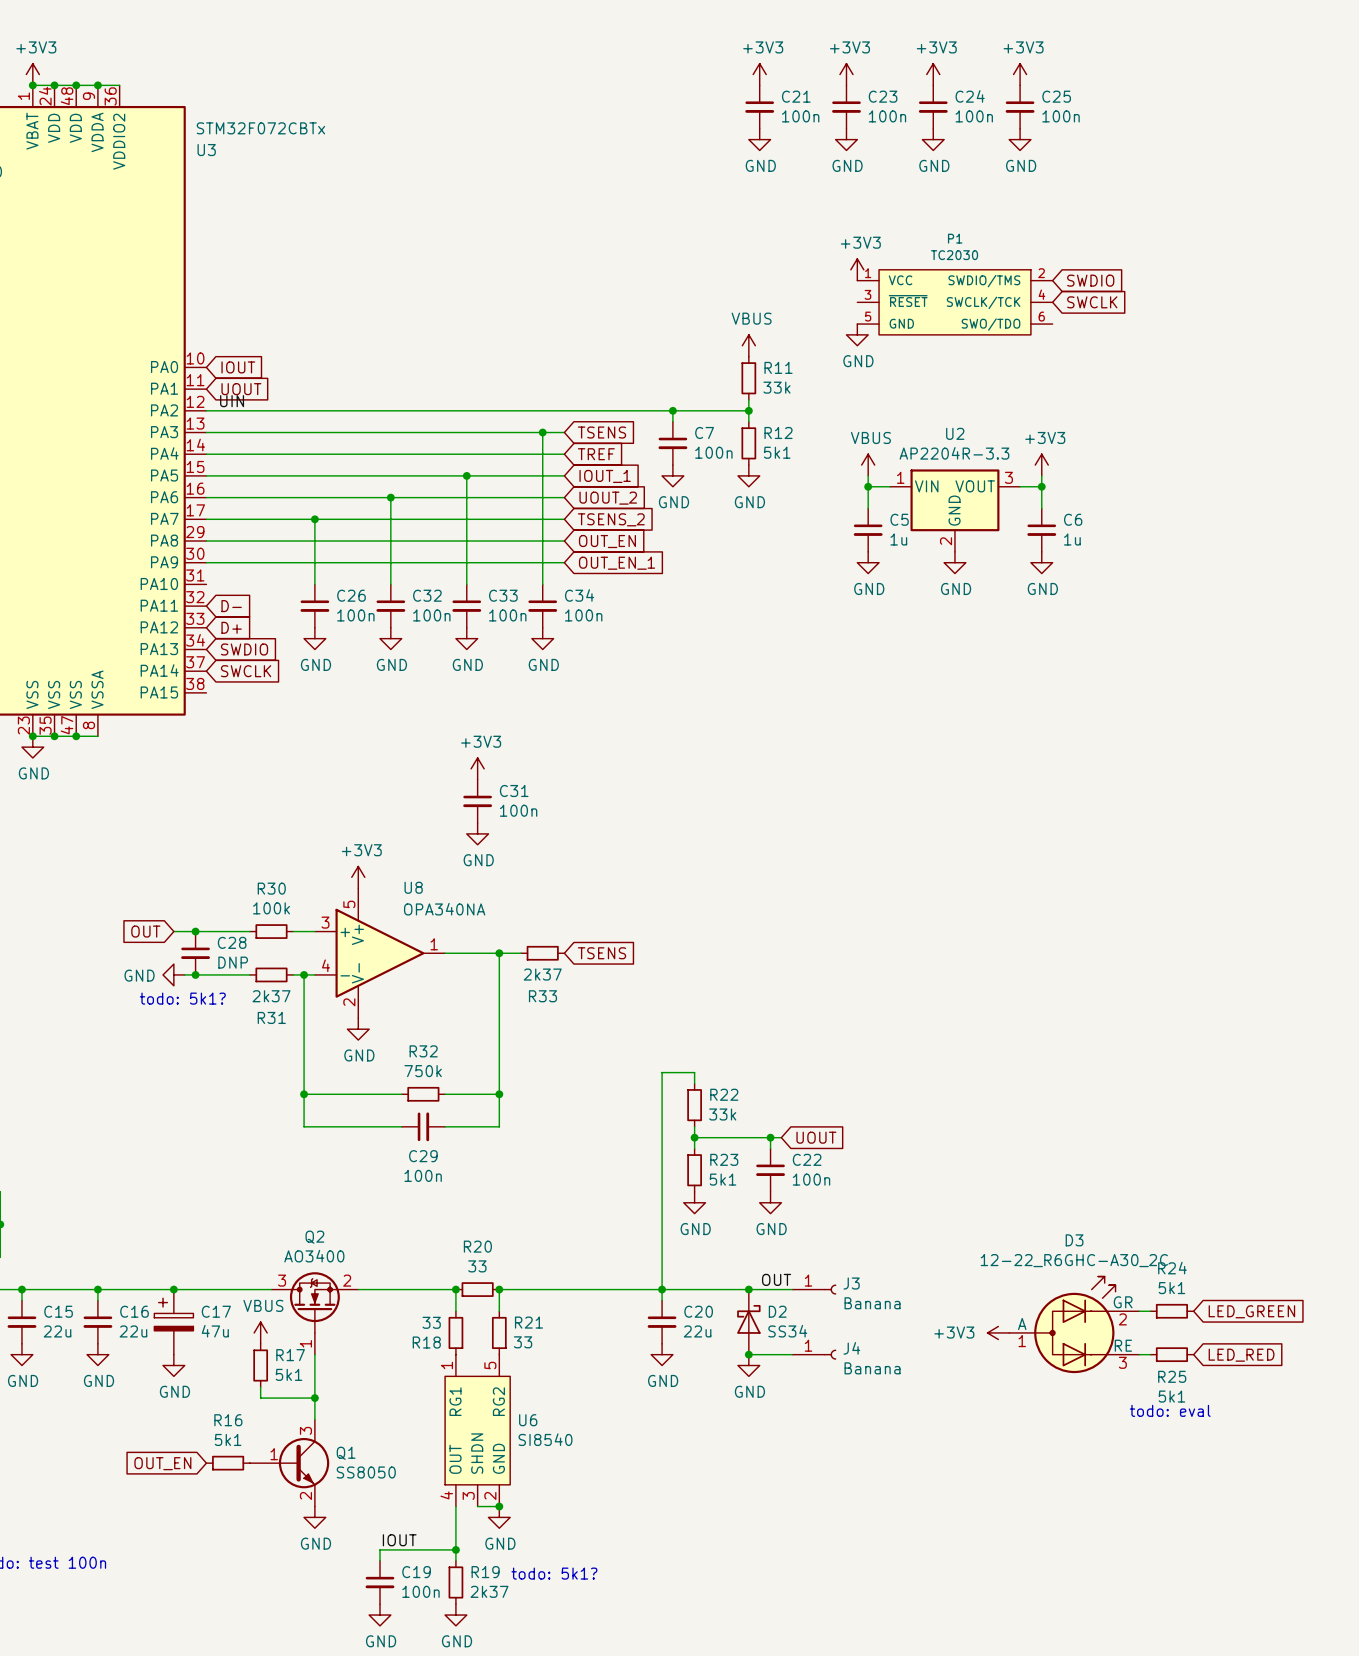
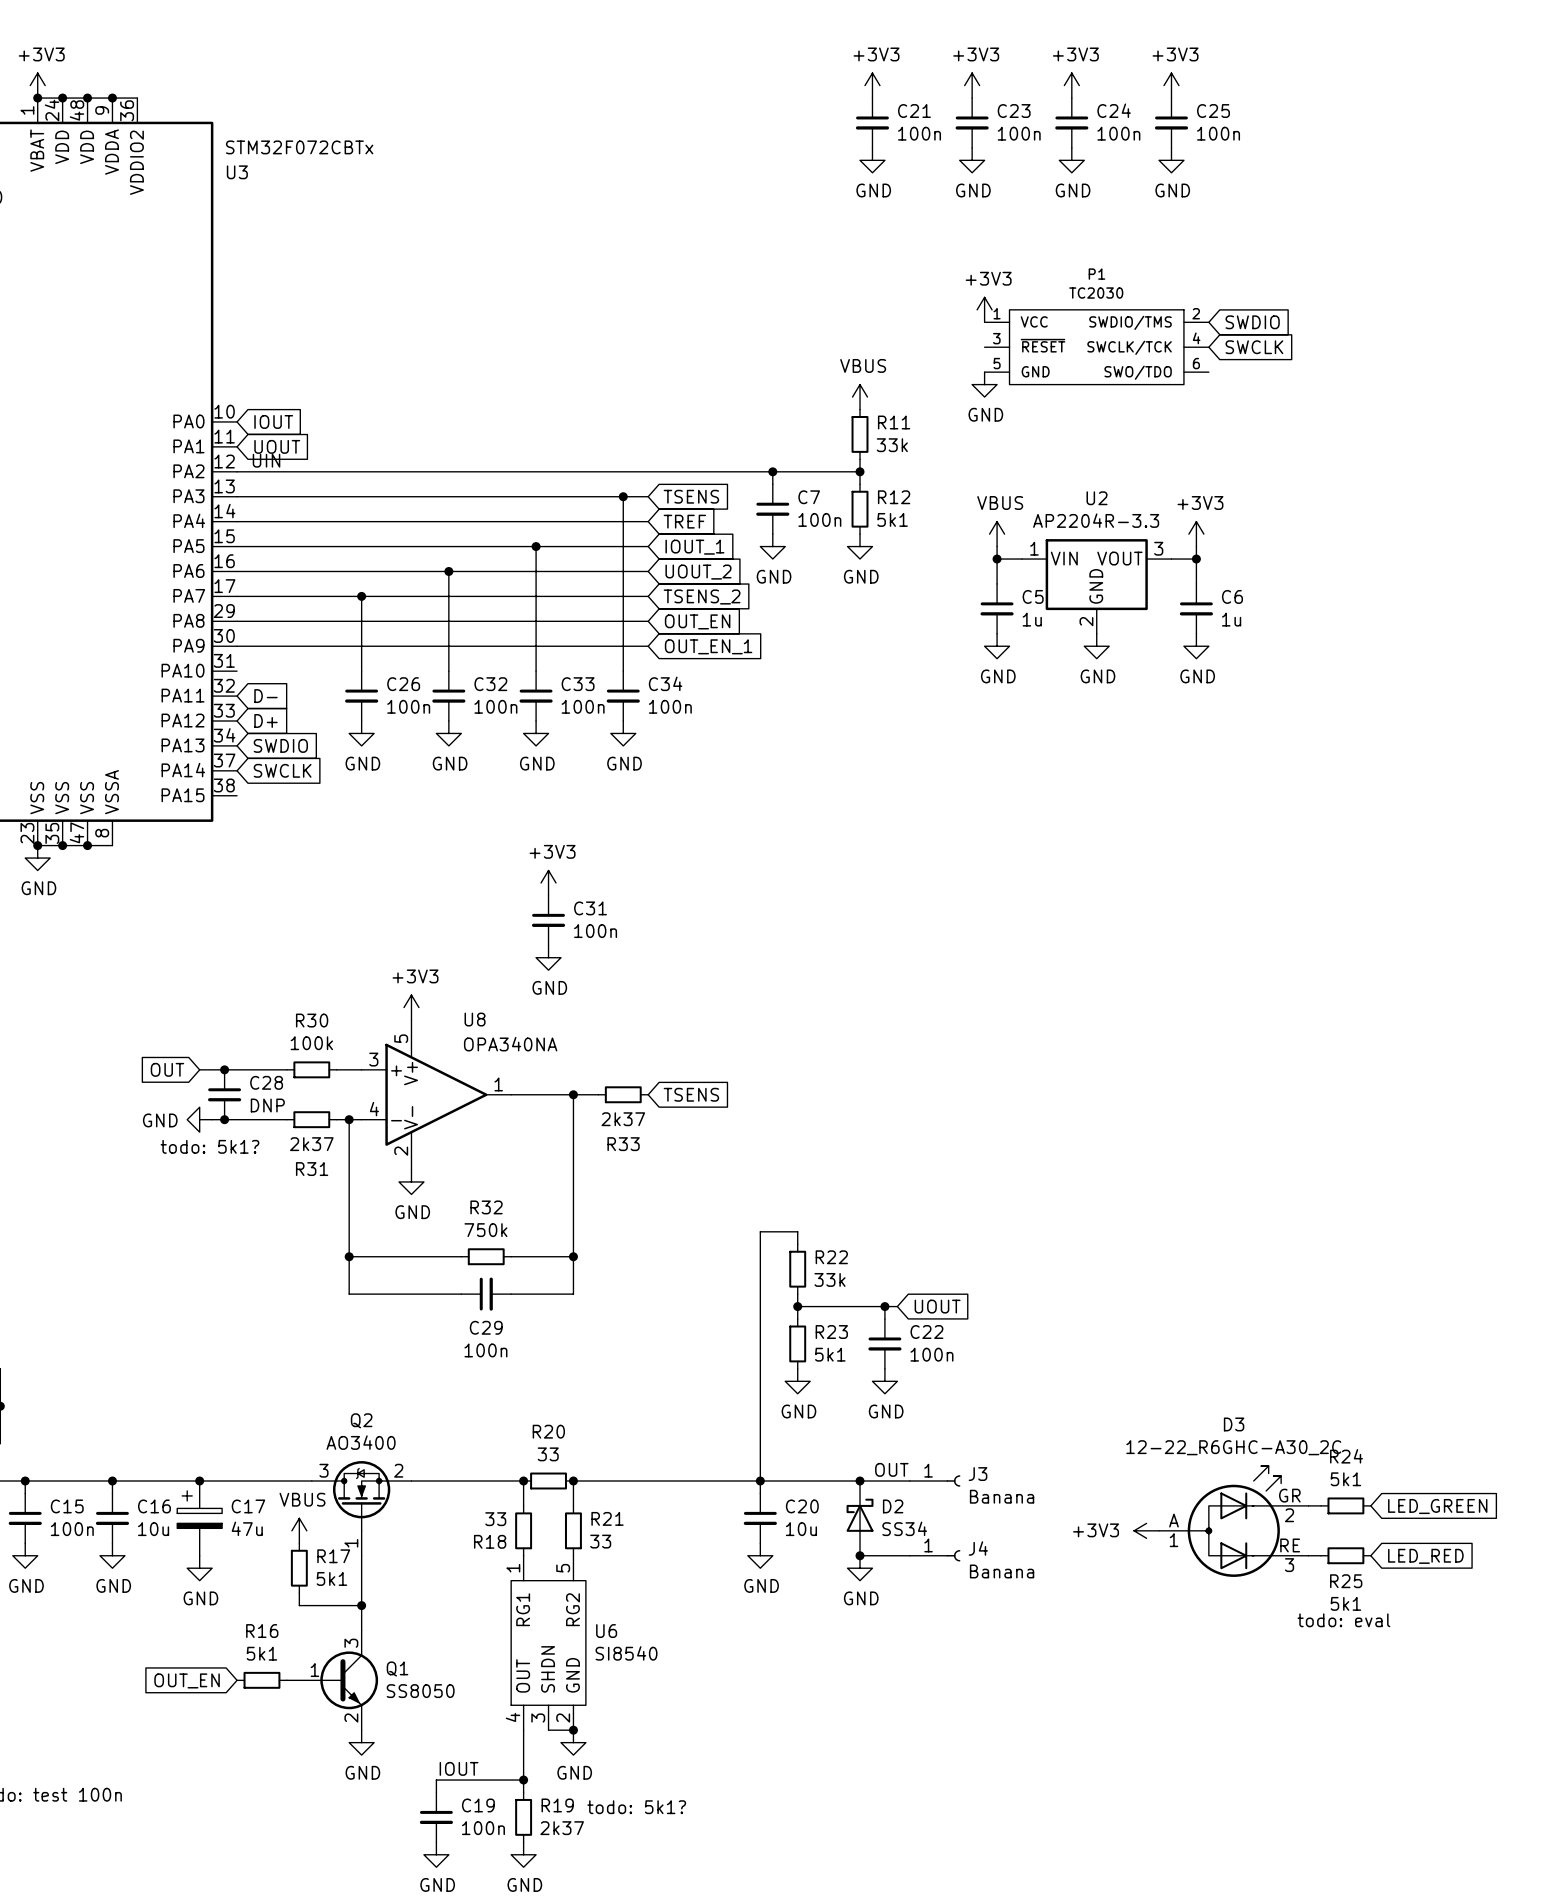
C15 value: 22u (57, 1331) -> 100n (72, 1529)
C16 value: 22u (133, 1331) -> 10u (153, 1529)
C20 value: 22u (697, 1331) -> 10u (801, 1529)

